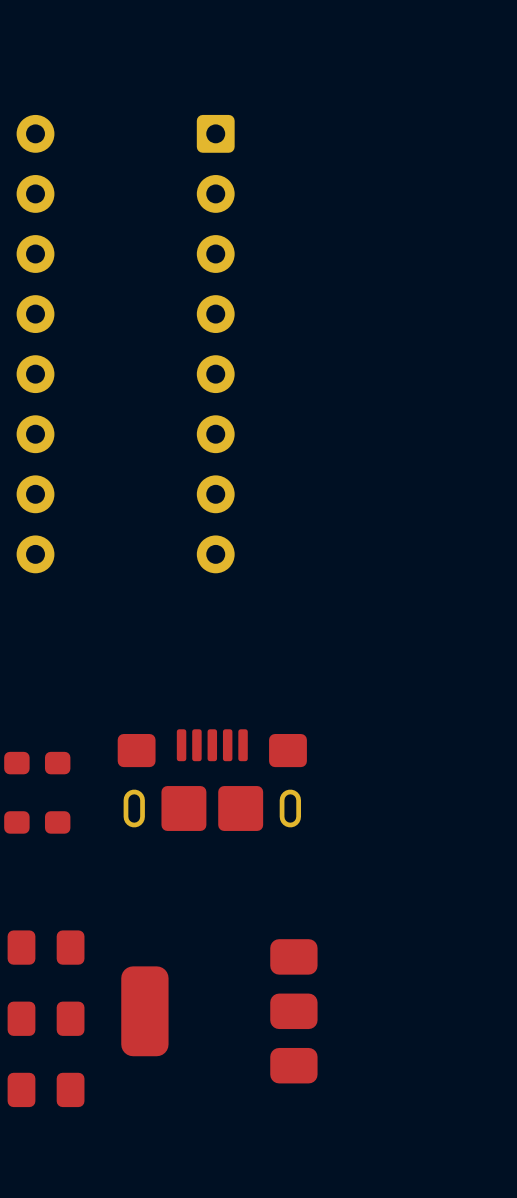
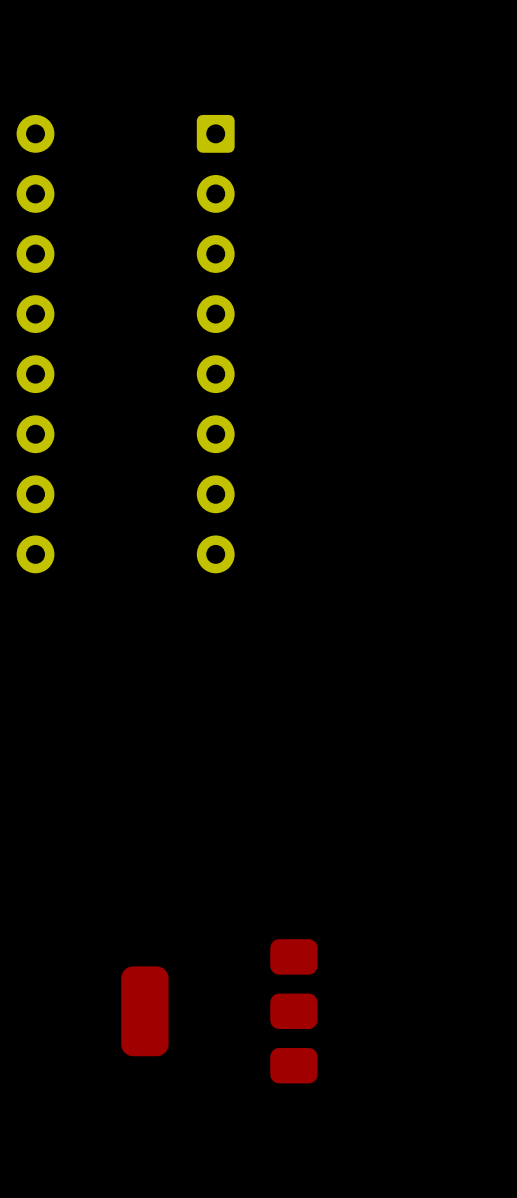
part: (37, 763) -> none
part: (212, 780) -> none
part: (37, 822) -> none
part: (46, 947) -> none
part: (46, 1018) -> none
part: (46, 1089) -> none

